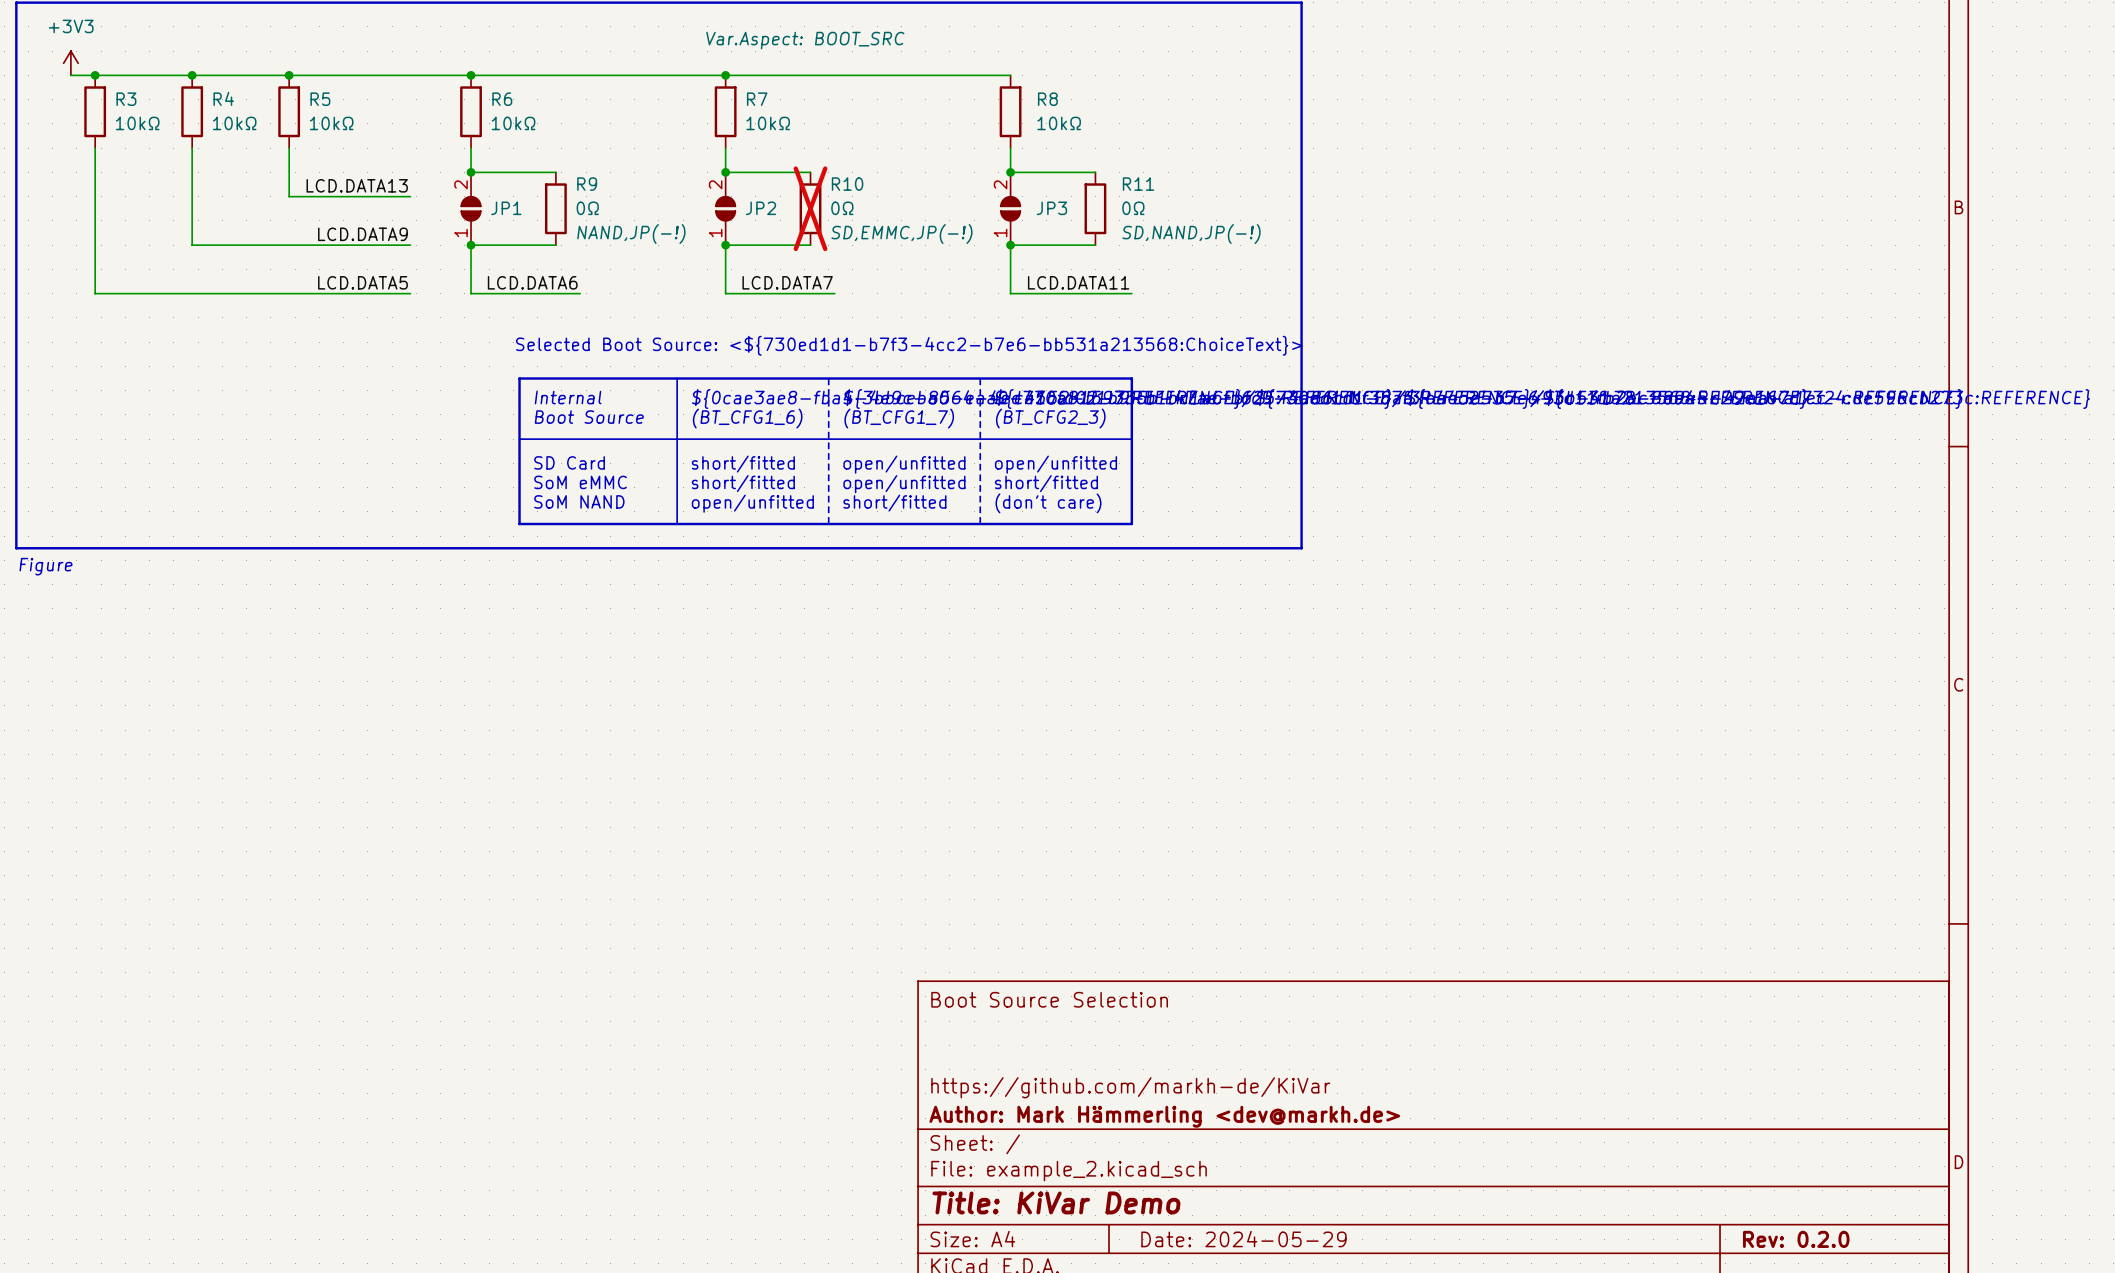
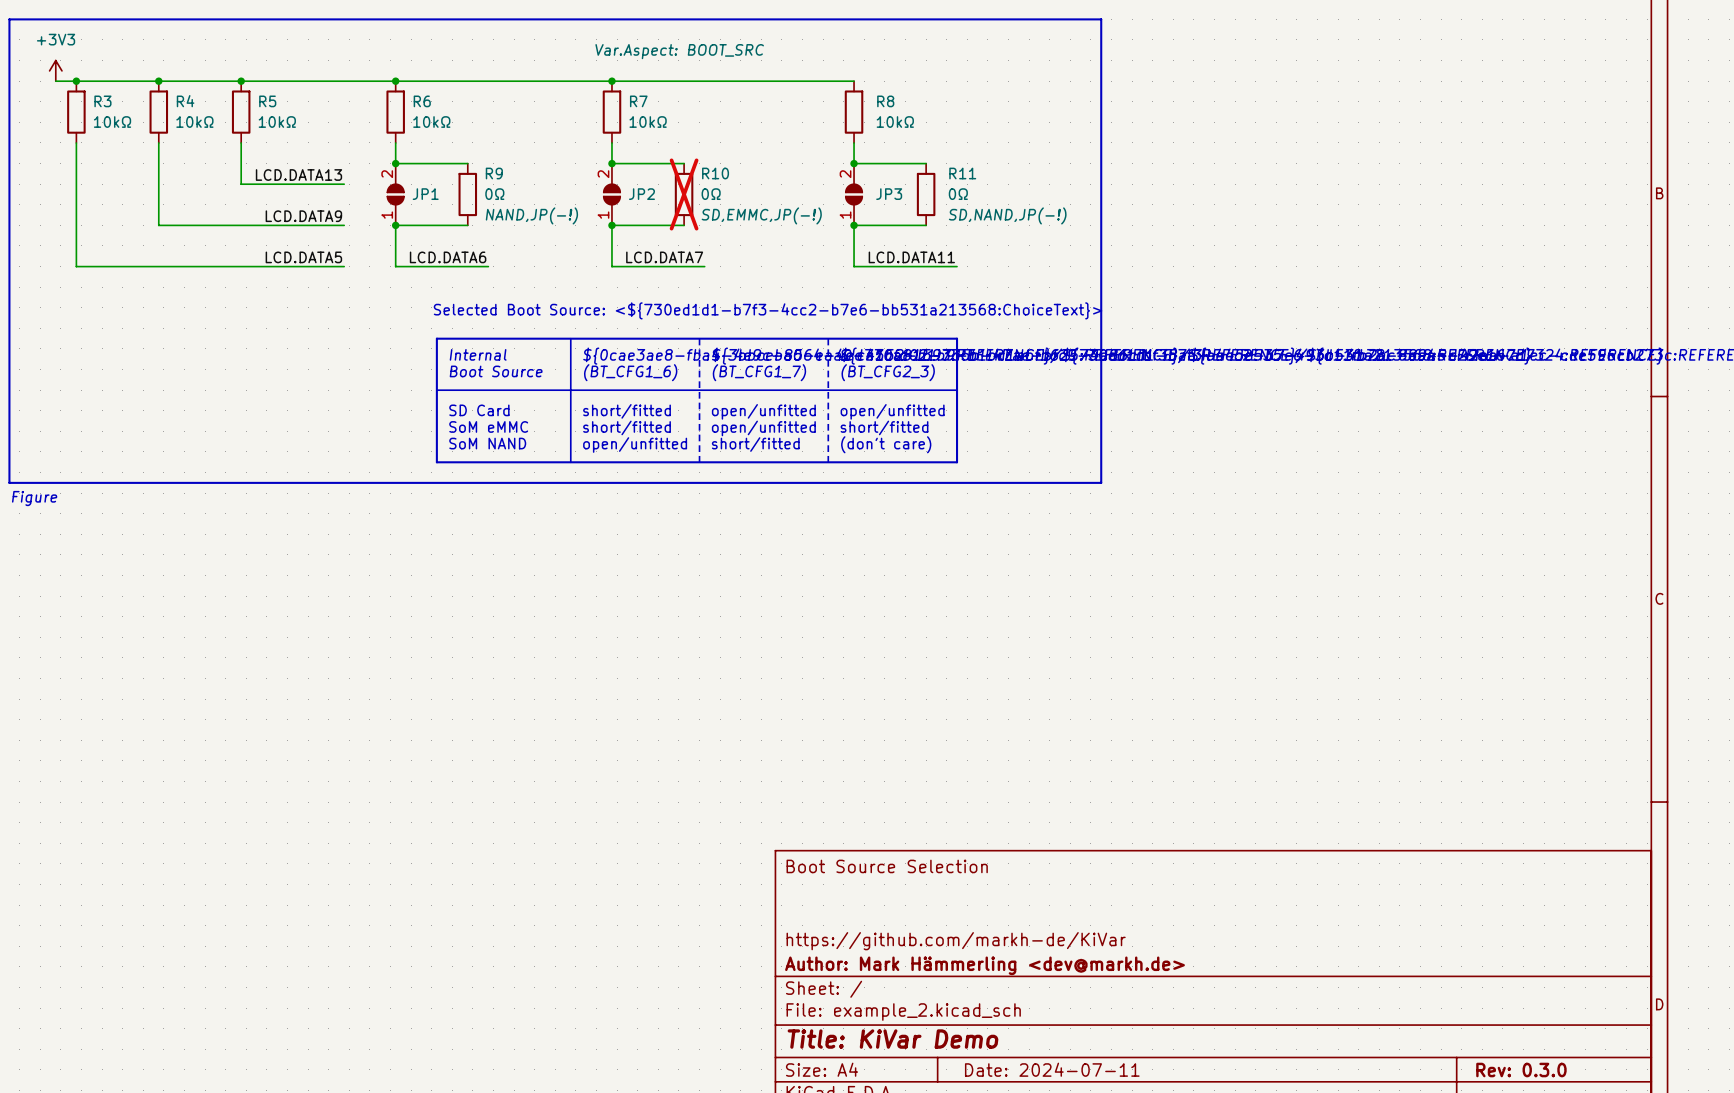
title block: Date: 2024-05-29 (1243, 1239) -> Date: 2024-07-11 (1052, 1069)
title block: Rev: 0.2.0 (1796, 1239) -> Rev: 0.3.0 (1521, 1070)

